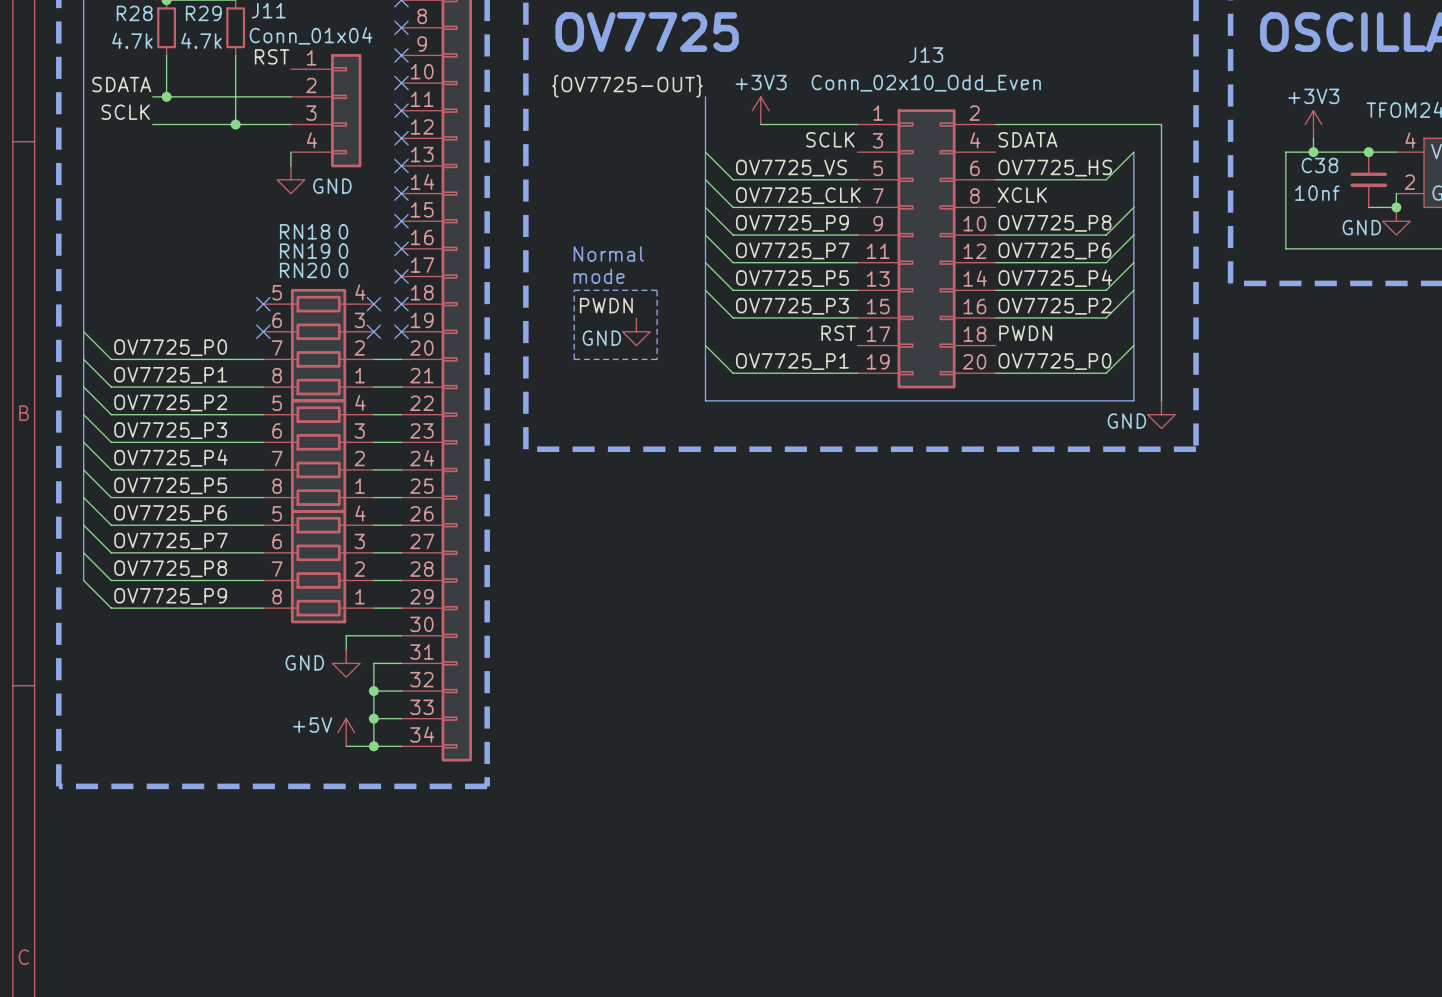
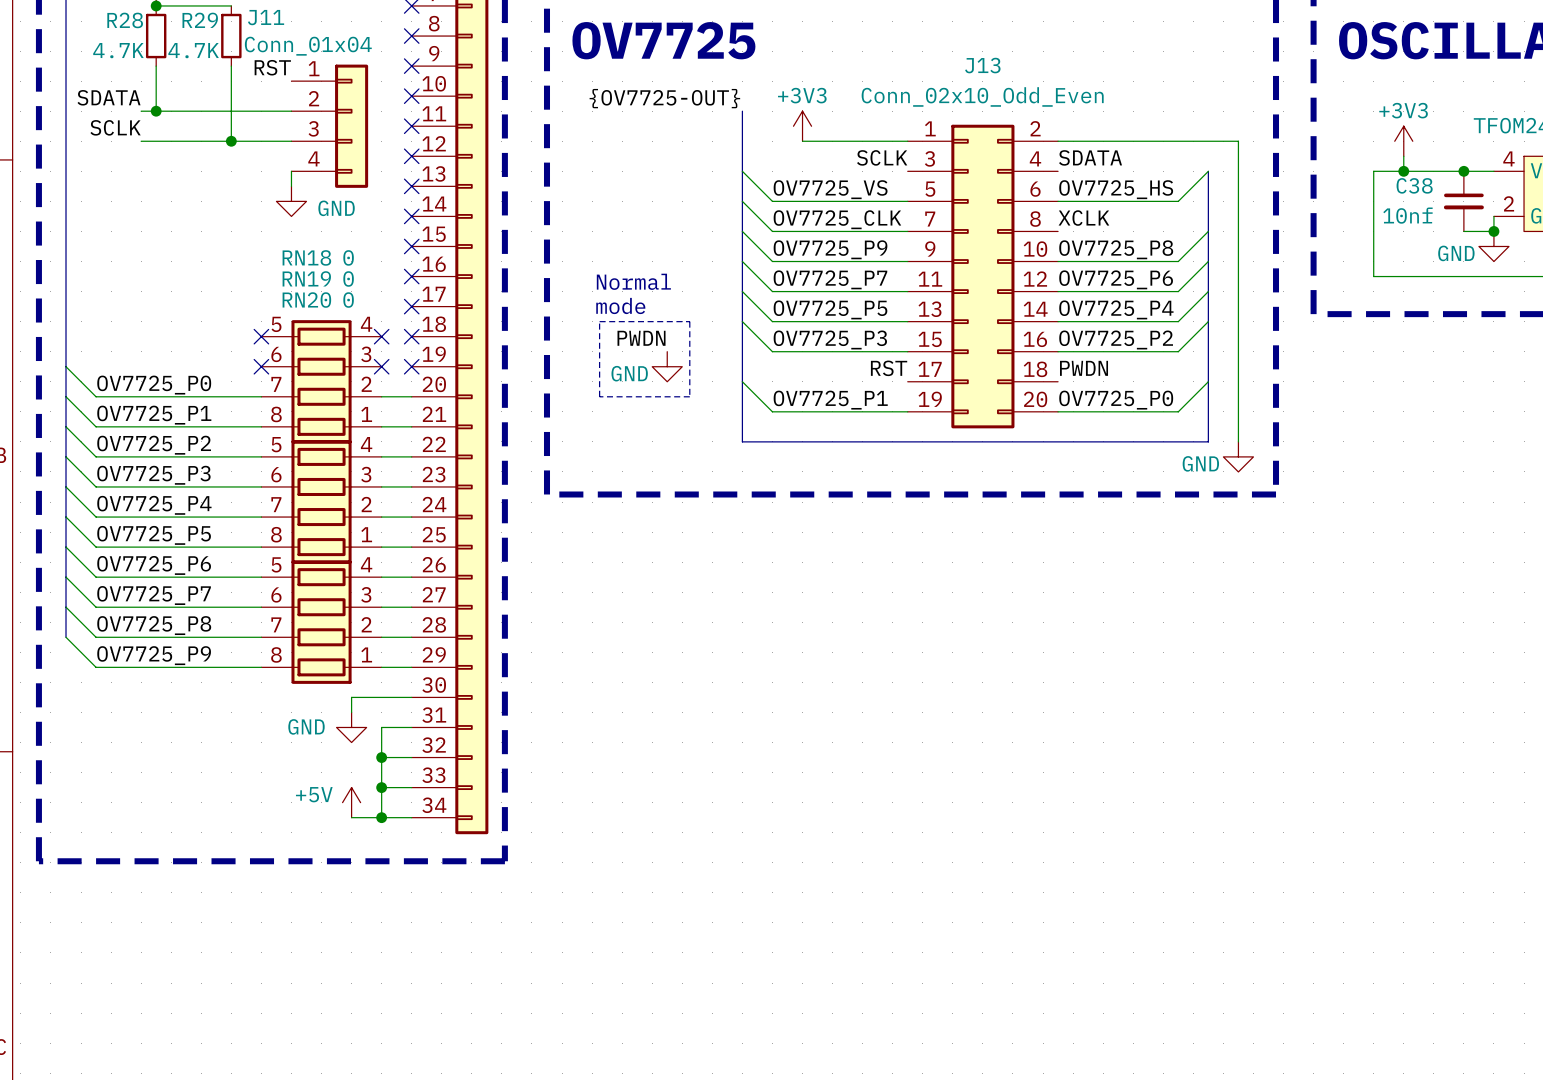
R28 value: 4.7k (132, 40) -> 4.7K (118, 50)
R29 value: 4.7k (201, 40) -> 4.7K (193, 50)

